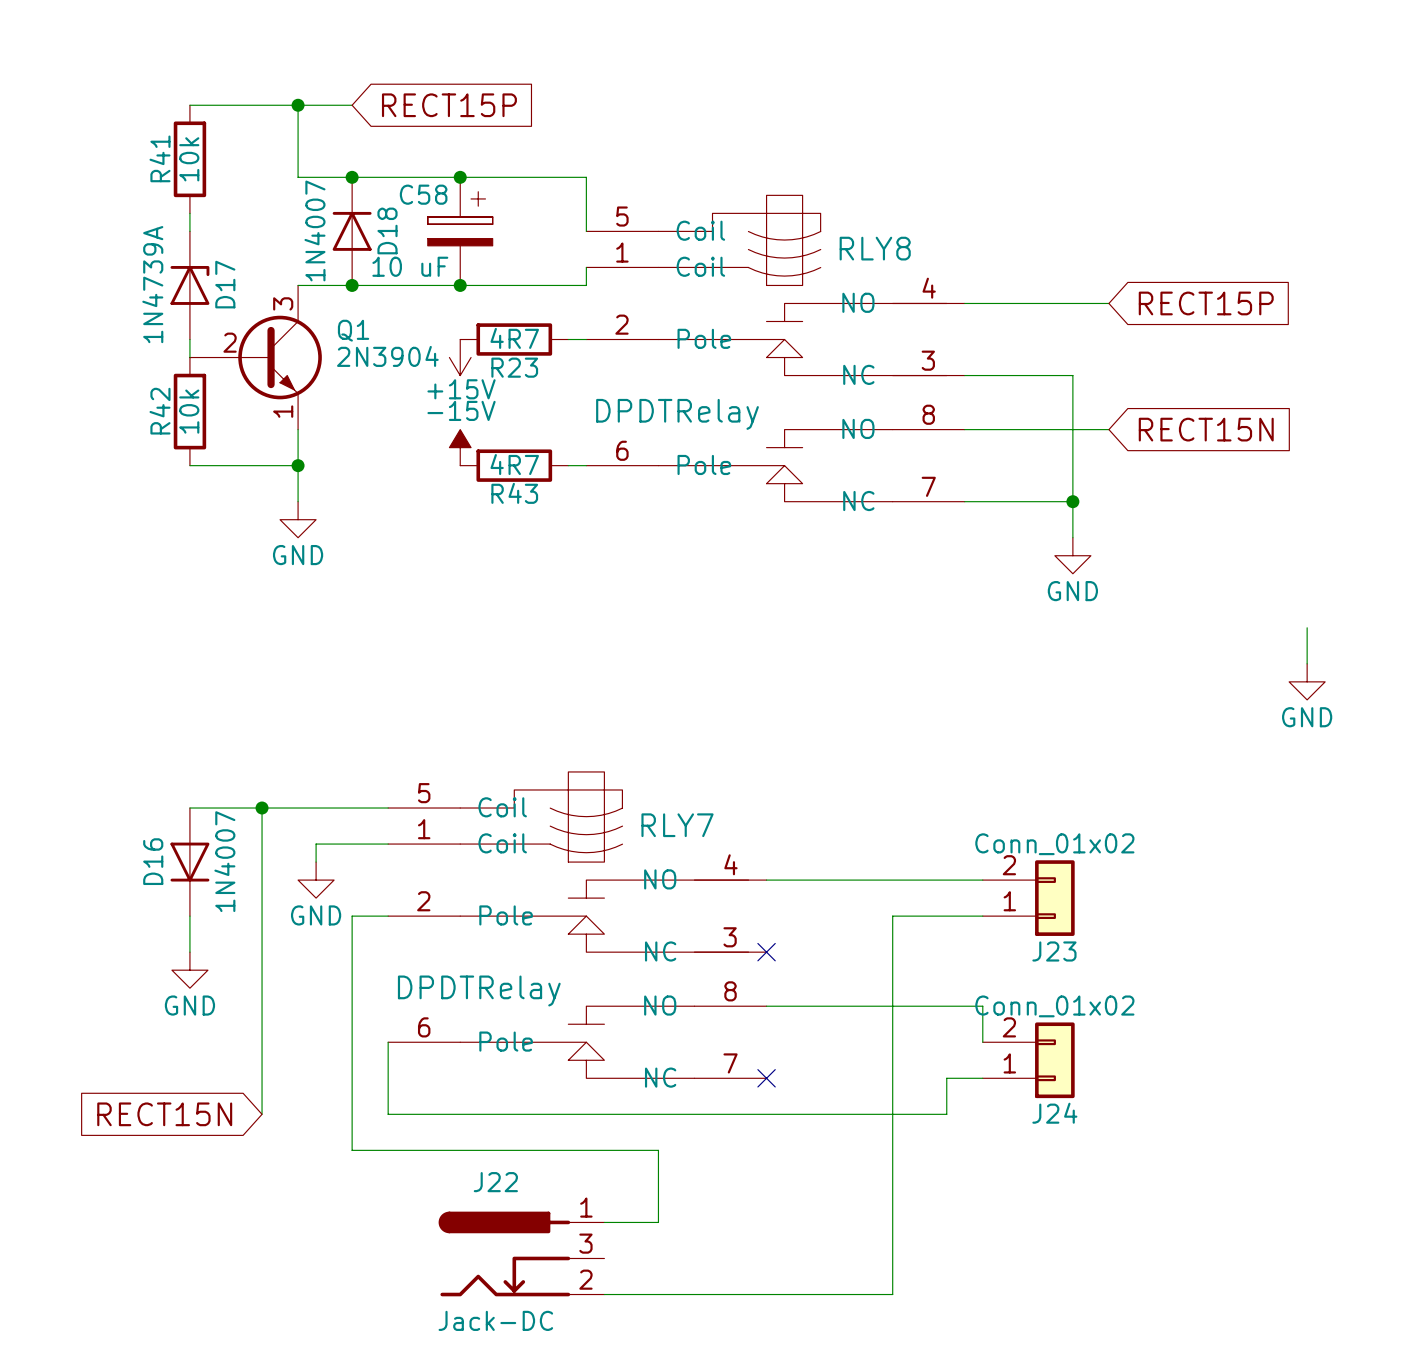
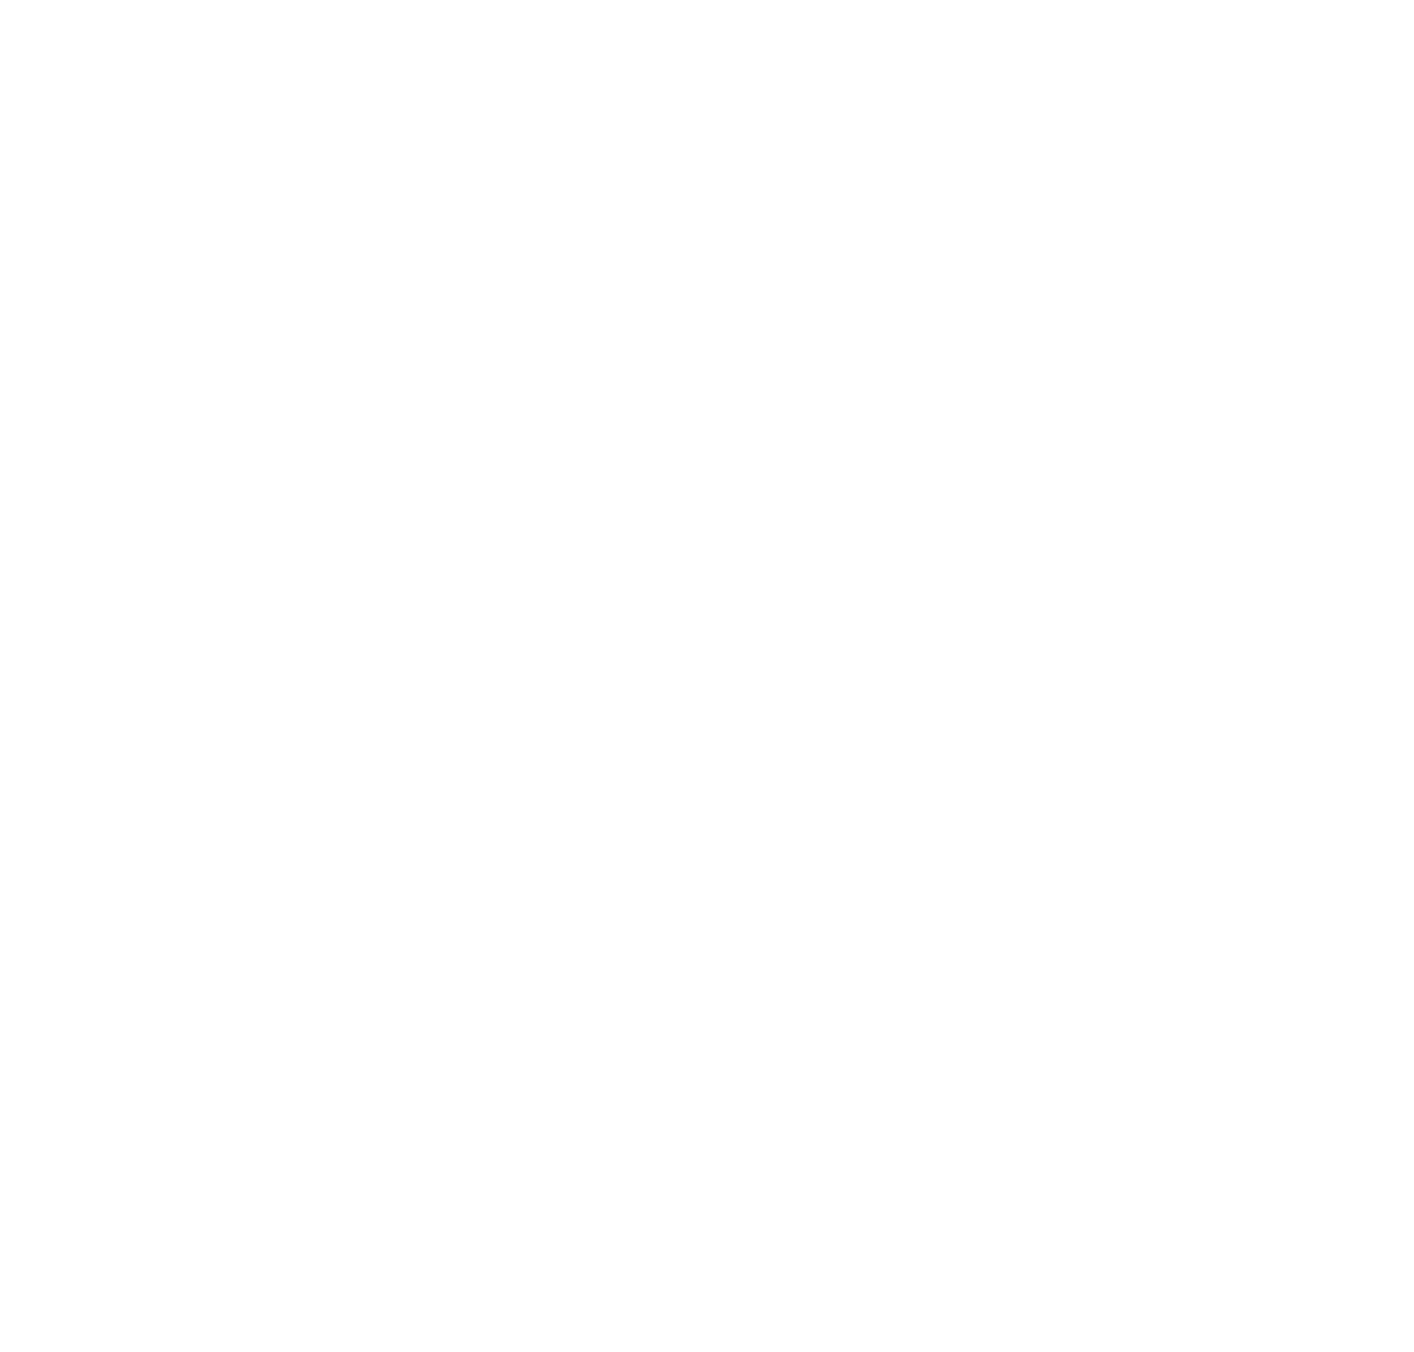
wire: (189, 105) (352, 105) -> none
wire: (298, 105) (298, 177) (586, 177) (586, 231) -> none
junction: (298, 105) -> none
global label: RECT15P (449, 105) -> none
R41: 10k (189, 159) -> none
junction: (352, 177) -> none
junction: (460, 177) -> none
wire: (189, 213) (189, 231) -> none
D18: 1N4007 (352, 231) -> none
C58: 10 uF (460, 231) -> none
wire: (586, 267) (586, 285) (298, 285) -> none
D17: 1N4739A (189, 285) -> none
junction: (352, 285) -> none
junction: (460, 285) -> none
wire: (964, 303) (1108, 303) -> none
global label: RECT15P (1206, 303) -> none
wire: (189, 339) (189, 357) -> none
R23: 4R7 (514, 339) -> none
wire: (568, 339) (586, 339) -> none
RLY8: DPDTRelay (775, 348) -> none
Q1: 2N3904 (255, 357) -> none
power symbol: +15V (460, 357) -> none
wire: (964, 375) (1072, 375) (1072, 537) -> none
R42: 10k (189, 411) -> none
wire: (298, 429) (298, 501) -> none
wire: (964, 429) (1108, 429) -> none
global label: RECT15N (1206, 429) -> none
power symbol: -15V (460, 447) -> none
wire: (189, 465) (298, 465) -> none
junction: (298, 465) -> none
R43: 4R7 (514, 465) -> none
wire: (568, 465) (586, 465) -> none
wire: (964, 501) (1072, 501) -> none
junction: (1072, 501) -> none
power symbol: GND (298, 519) -> none
power symbol: GND (1072, 555) -> none
wire: (1307, 627) (1307, 663) -> none
power symbol: GND (1307, 681) -> none
wire: (189, 808) (388, 808) -> none
wire: (262, 808) (262, 1114) -> none
junction: (262, 808) -> none
wire: (388, 844) (316, 844) (316, 862) -> none
D16: 1N4007 (189, 862) -> none
power symbol: GND (316, 880) -> none
wire: (766, 880) (982, 880) -> none
J23: Conn_01x02 (1028, 898) -> none
wire: (189, 916) (189, 952) -> none
wire: (388, 916) (352, 916) (352, 1150) (658, 1150) (658, 1222) (604, 1222) -> none
wire: (982, 916) (892, 916) (892, 1294) (604, 1294) -> none
RLY7: DPDTRelay (577, 925) -> none
no-connect mark: (766, 952) -> none
power symbol: GND (189, 970) -> none
wire: (766, 1006) (982, 1006) (982, 1042) -> none
wire: (388, 1042) (388, 1114) (946, 1114) (946, 1078) (982, 1078) -> none
J24: Conn_01x02 (1028, 1060) -> none
no-connect mark: (766, 1078) -> none
global label: RECT15N (164, 1114) -> none
J22: Jack-DC (521, 1253) -> none

